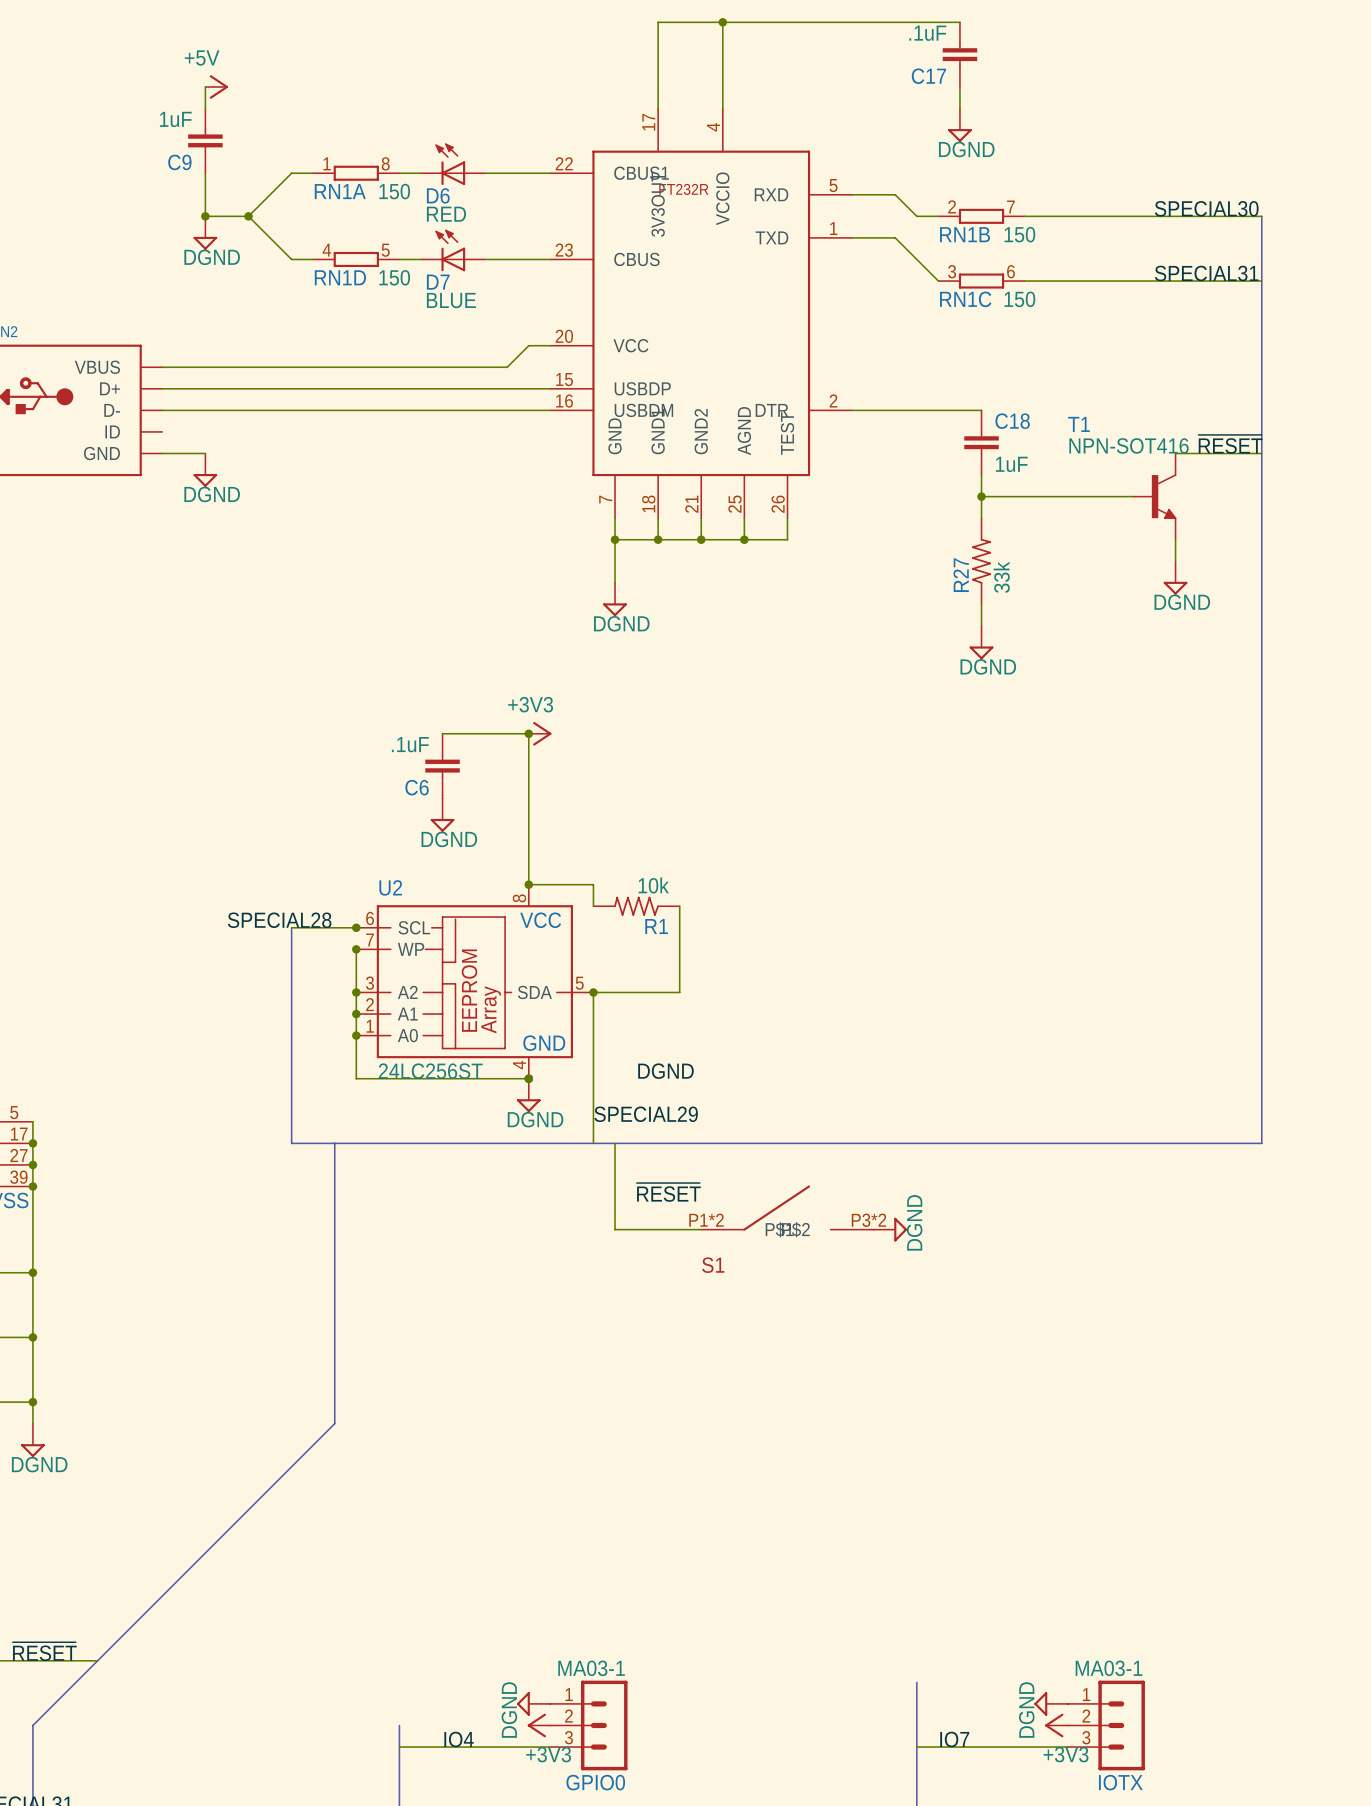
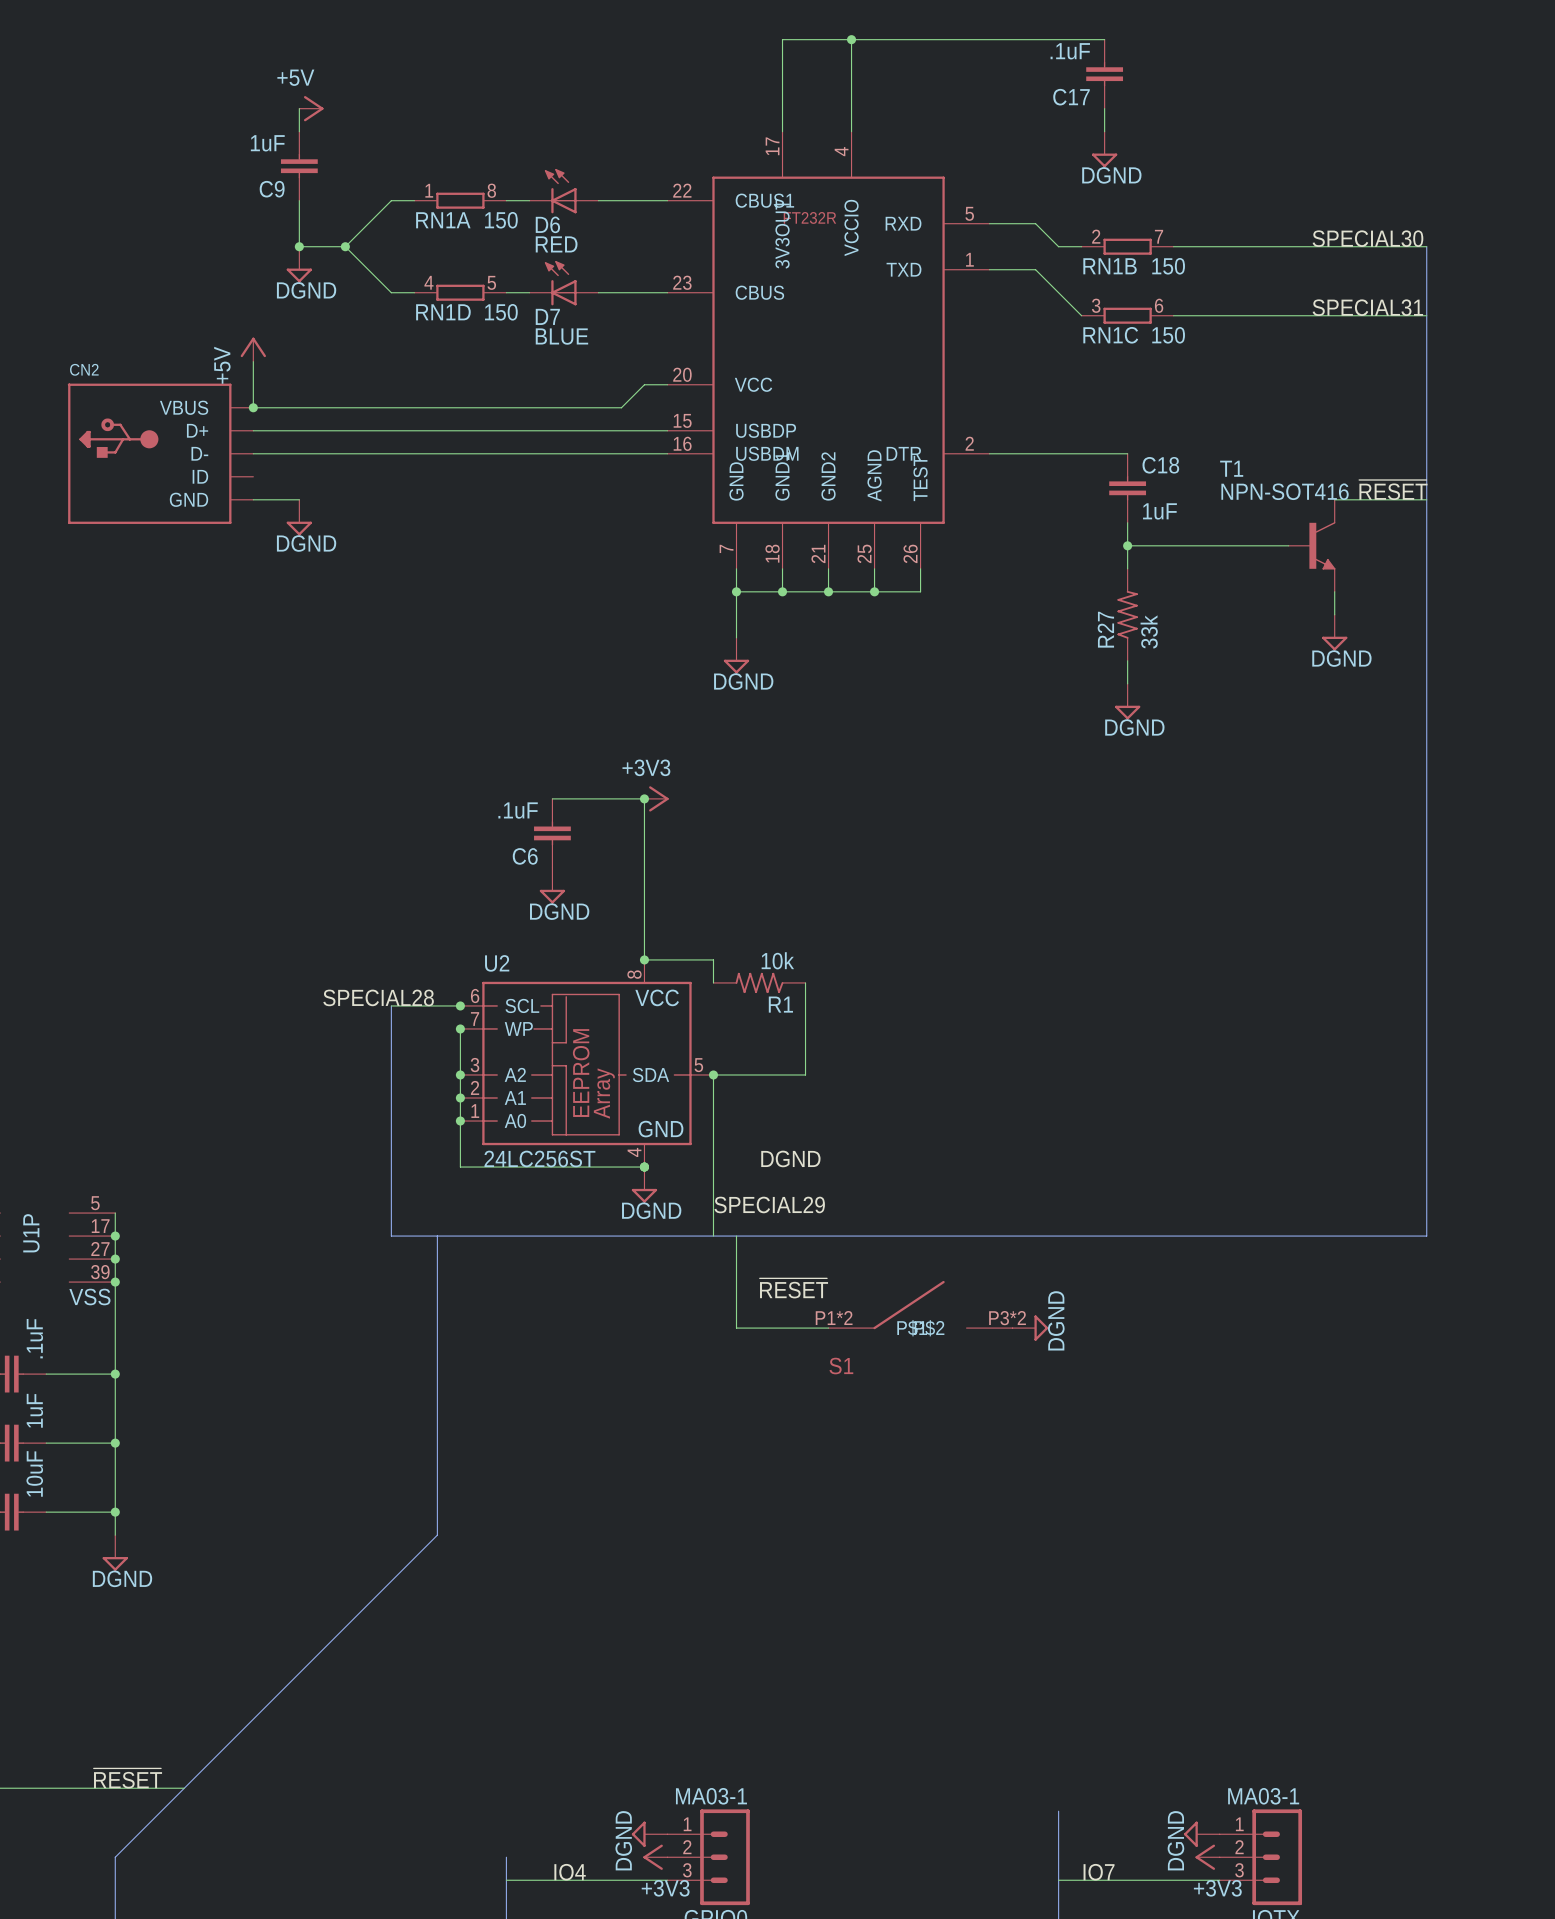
power symbol: none -> +5V (253, 349)
wire: none -> (253, 361) (253, 407)
junction: none -> (253, 407)

